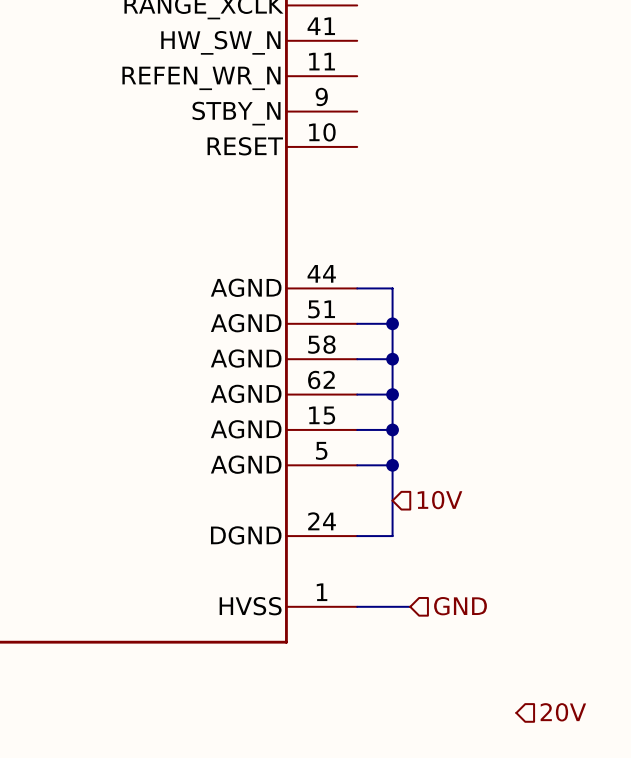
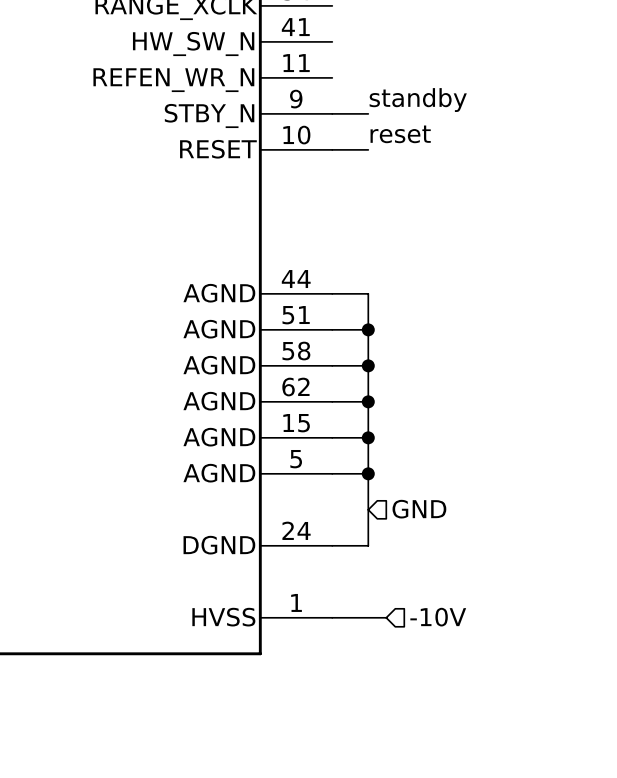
label: none -> standby (418, 100)
wire: none -> (332, 113) (368, 113)
label: none -> reset (400, 134)
wire: none -> (332, 149) (368, 149)
hierarchical label: 10V (440, 500) -> GND (419, 509)
hierarchical label: GND (460, 606) -> -10V (438, 617)
hierarchical label: 20V (563, 712) -> none

